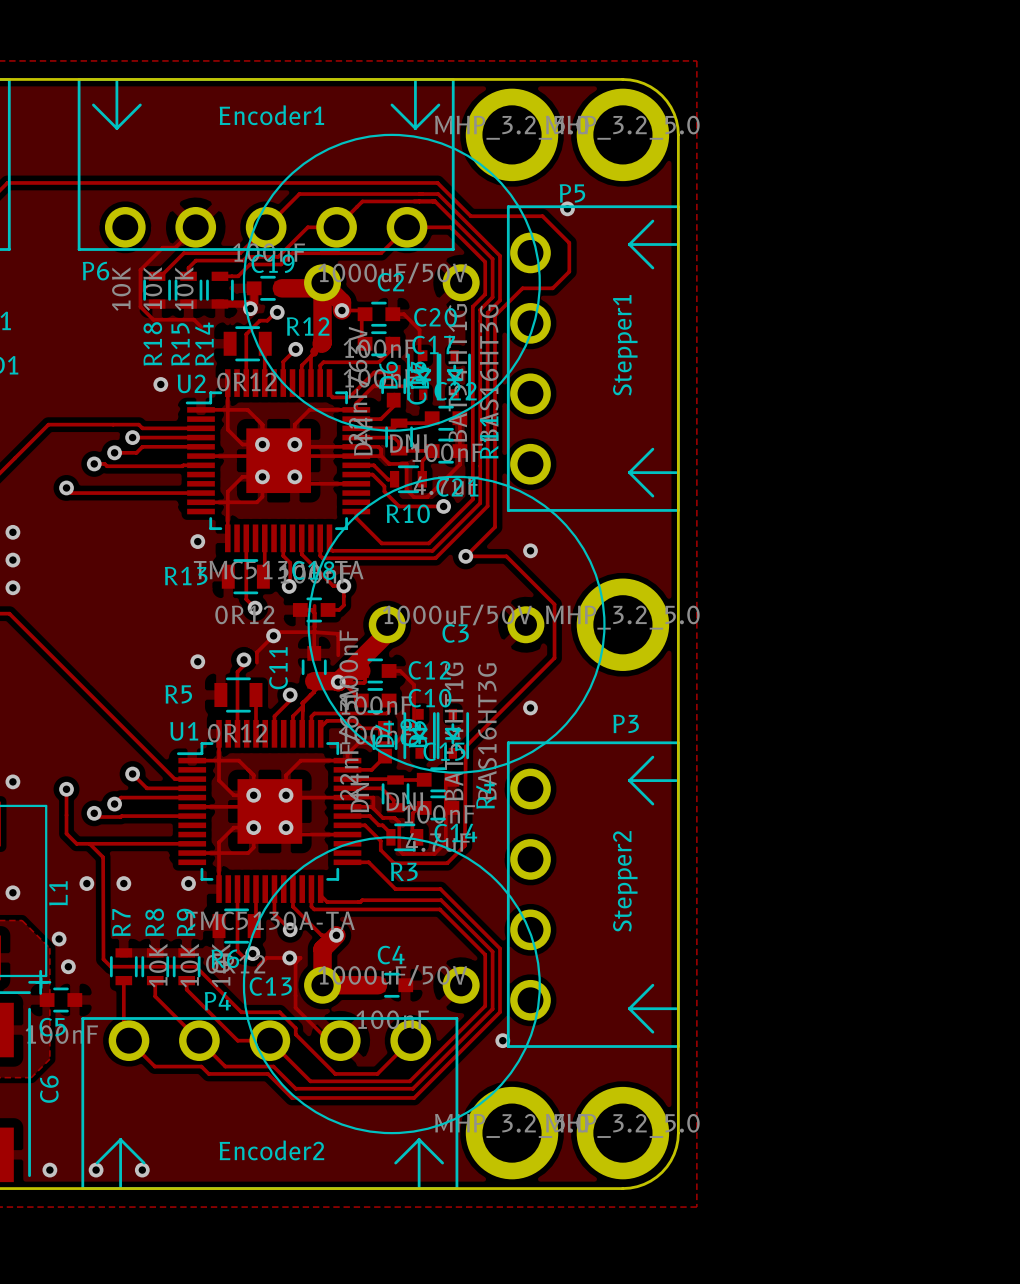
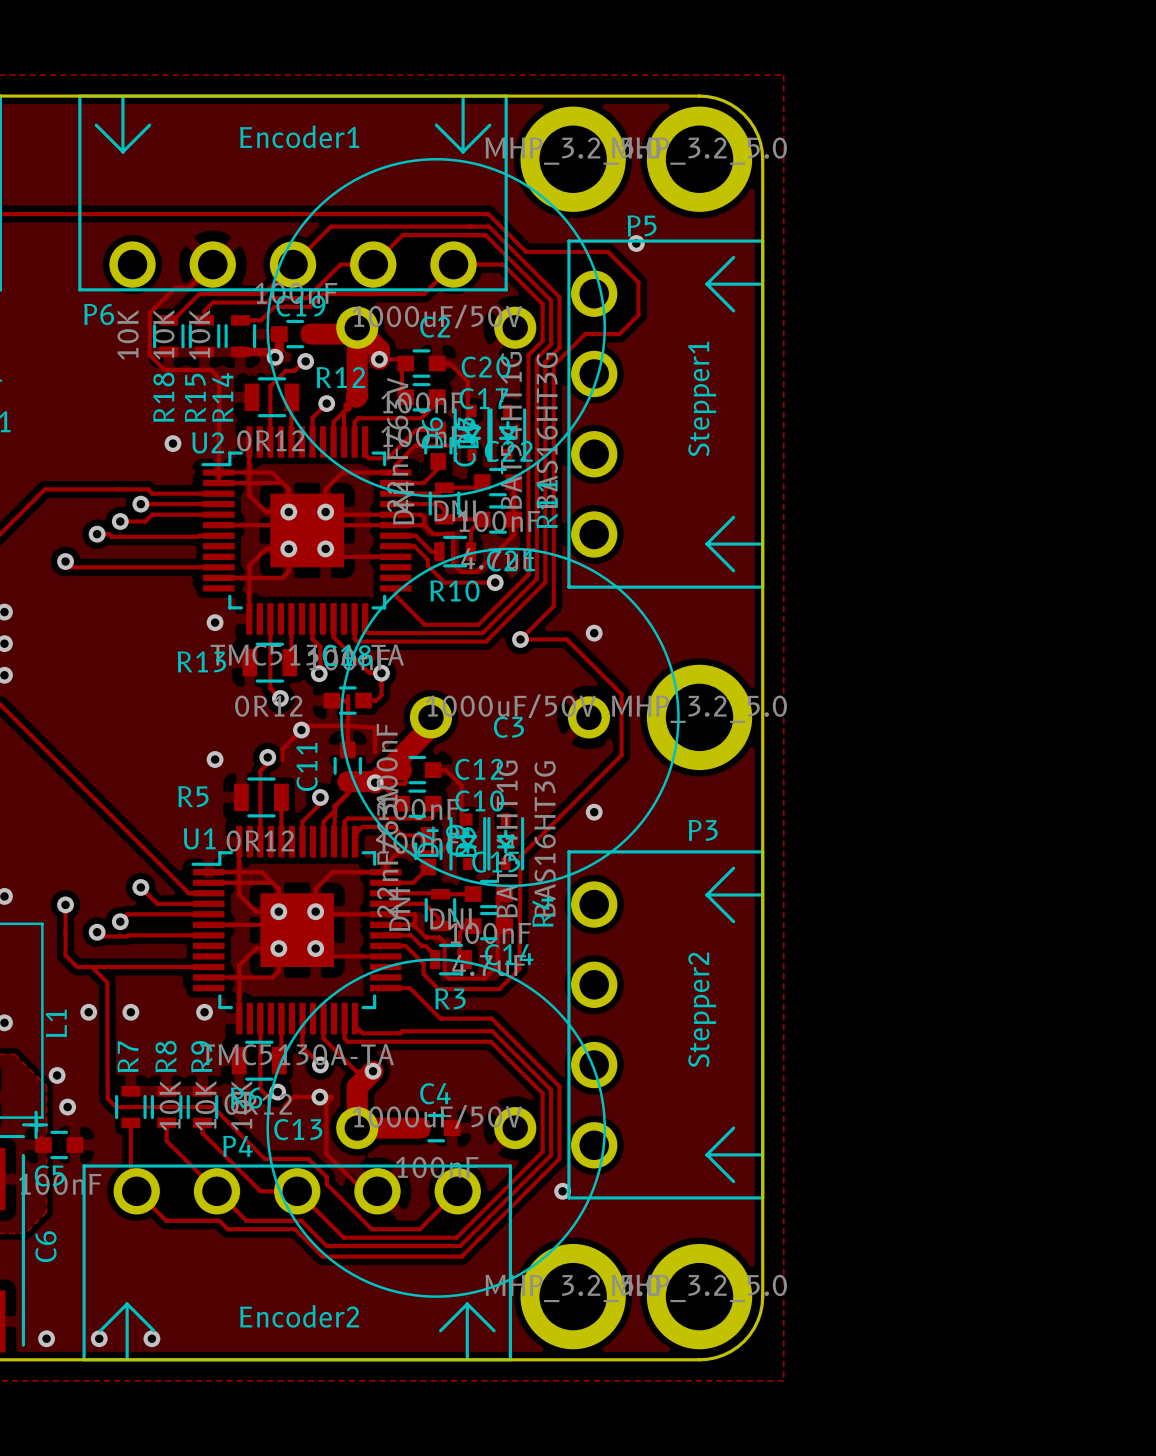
track: none -> (219, 378) (218, 483) (282, 483)
track: none -> (208, 882) (272, 882)

